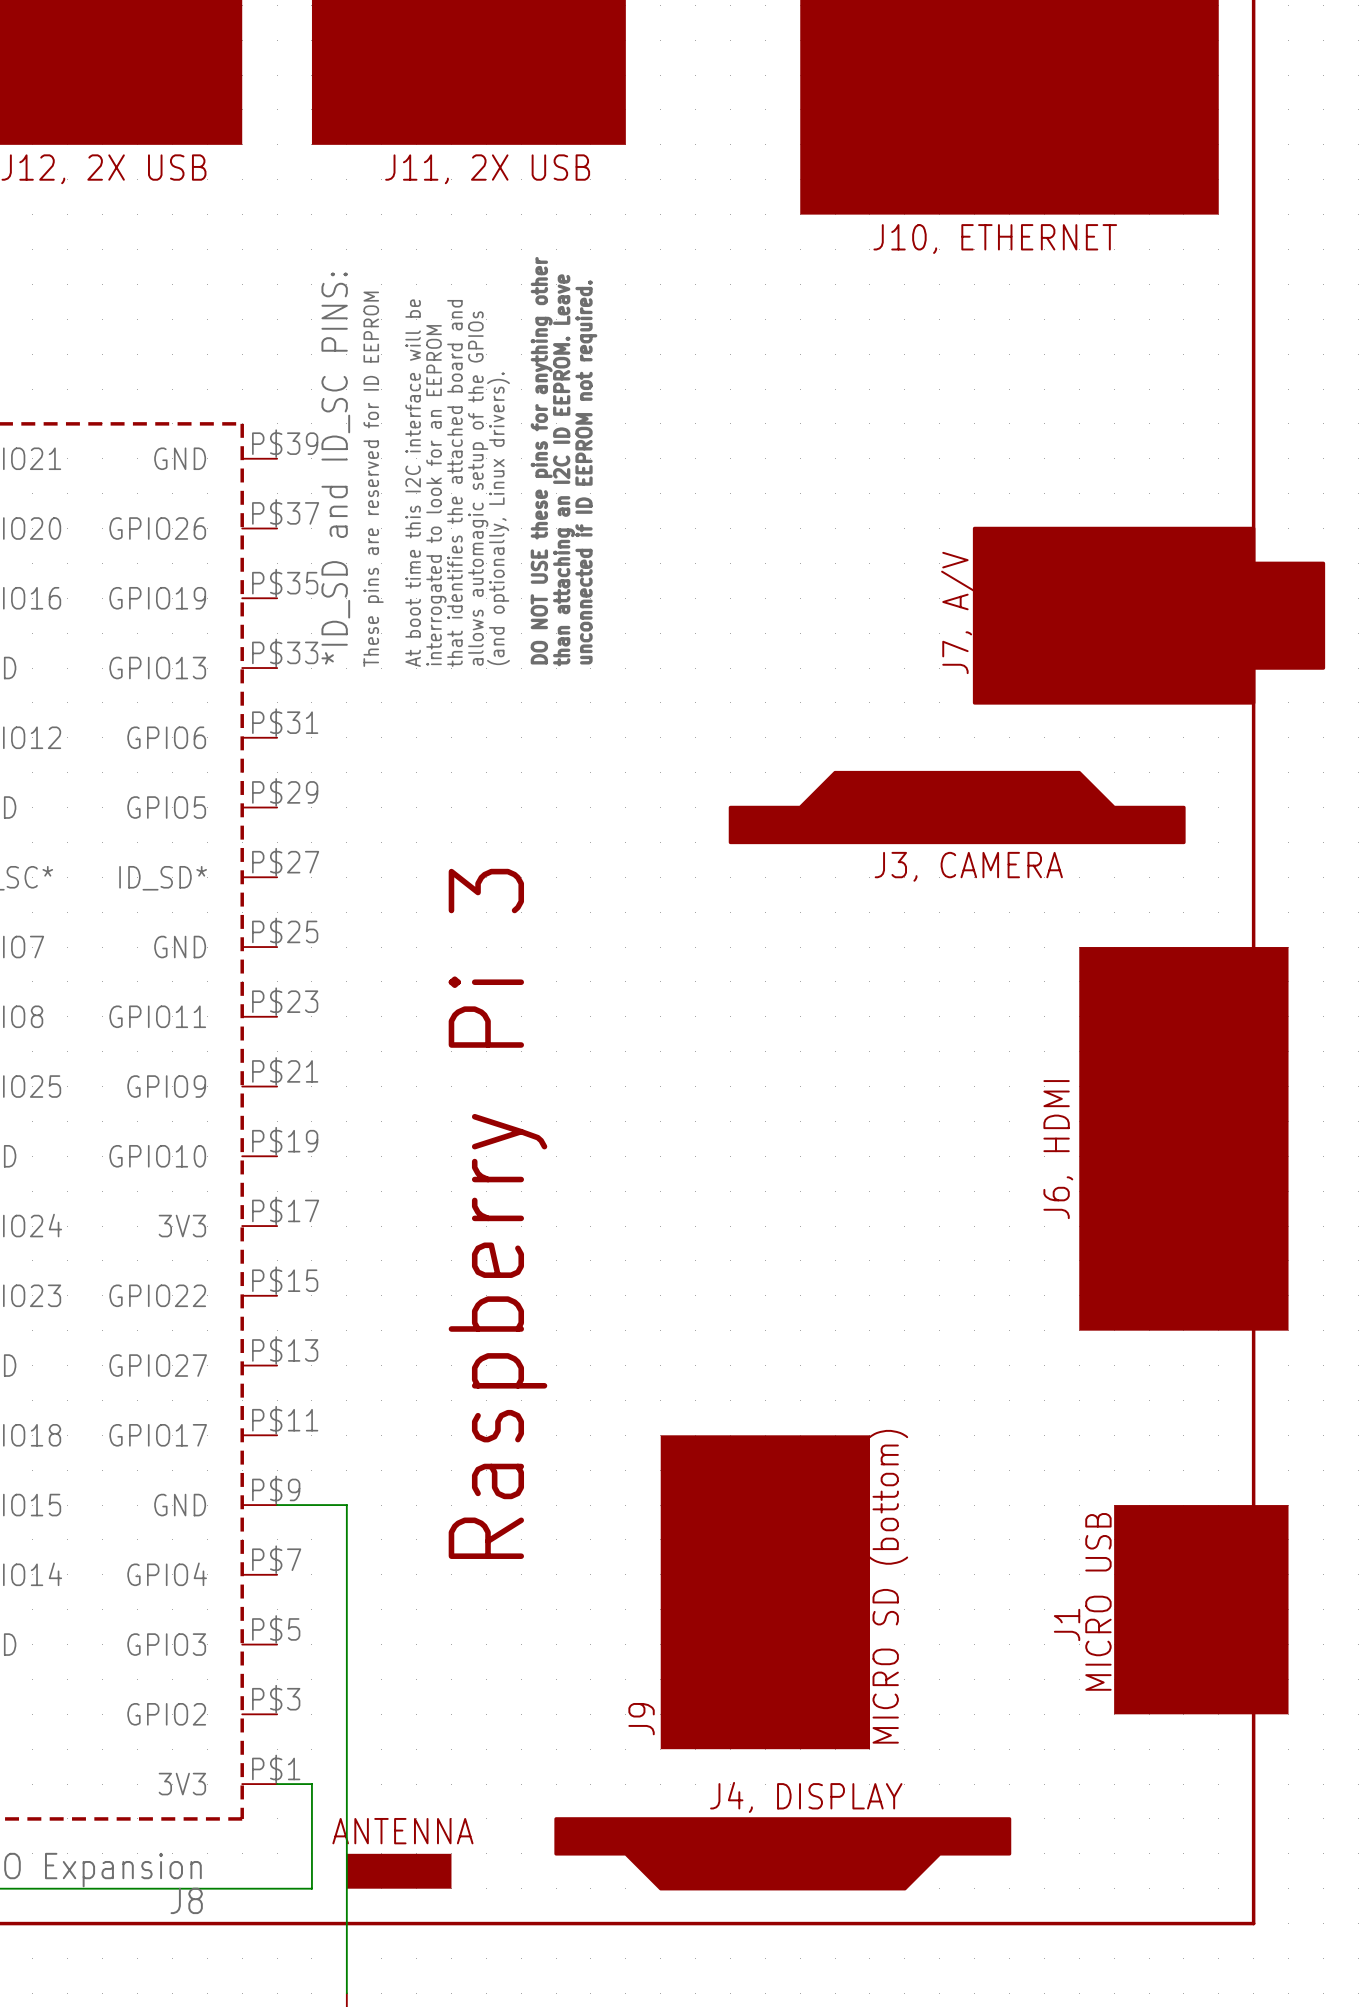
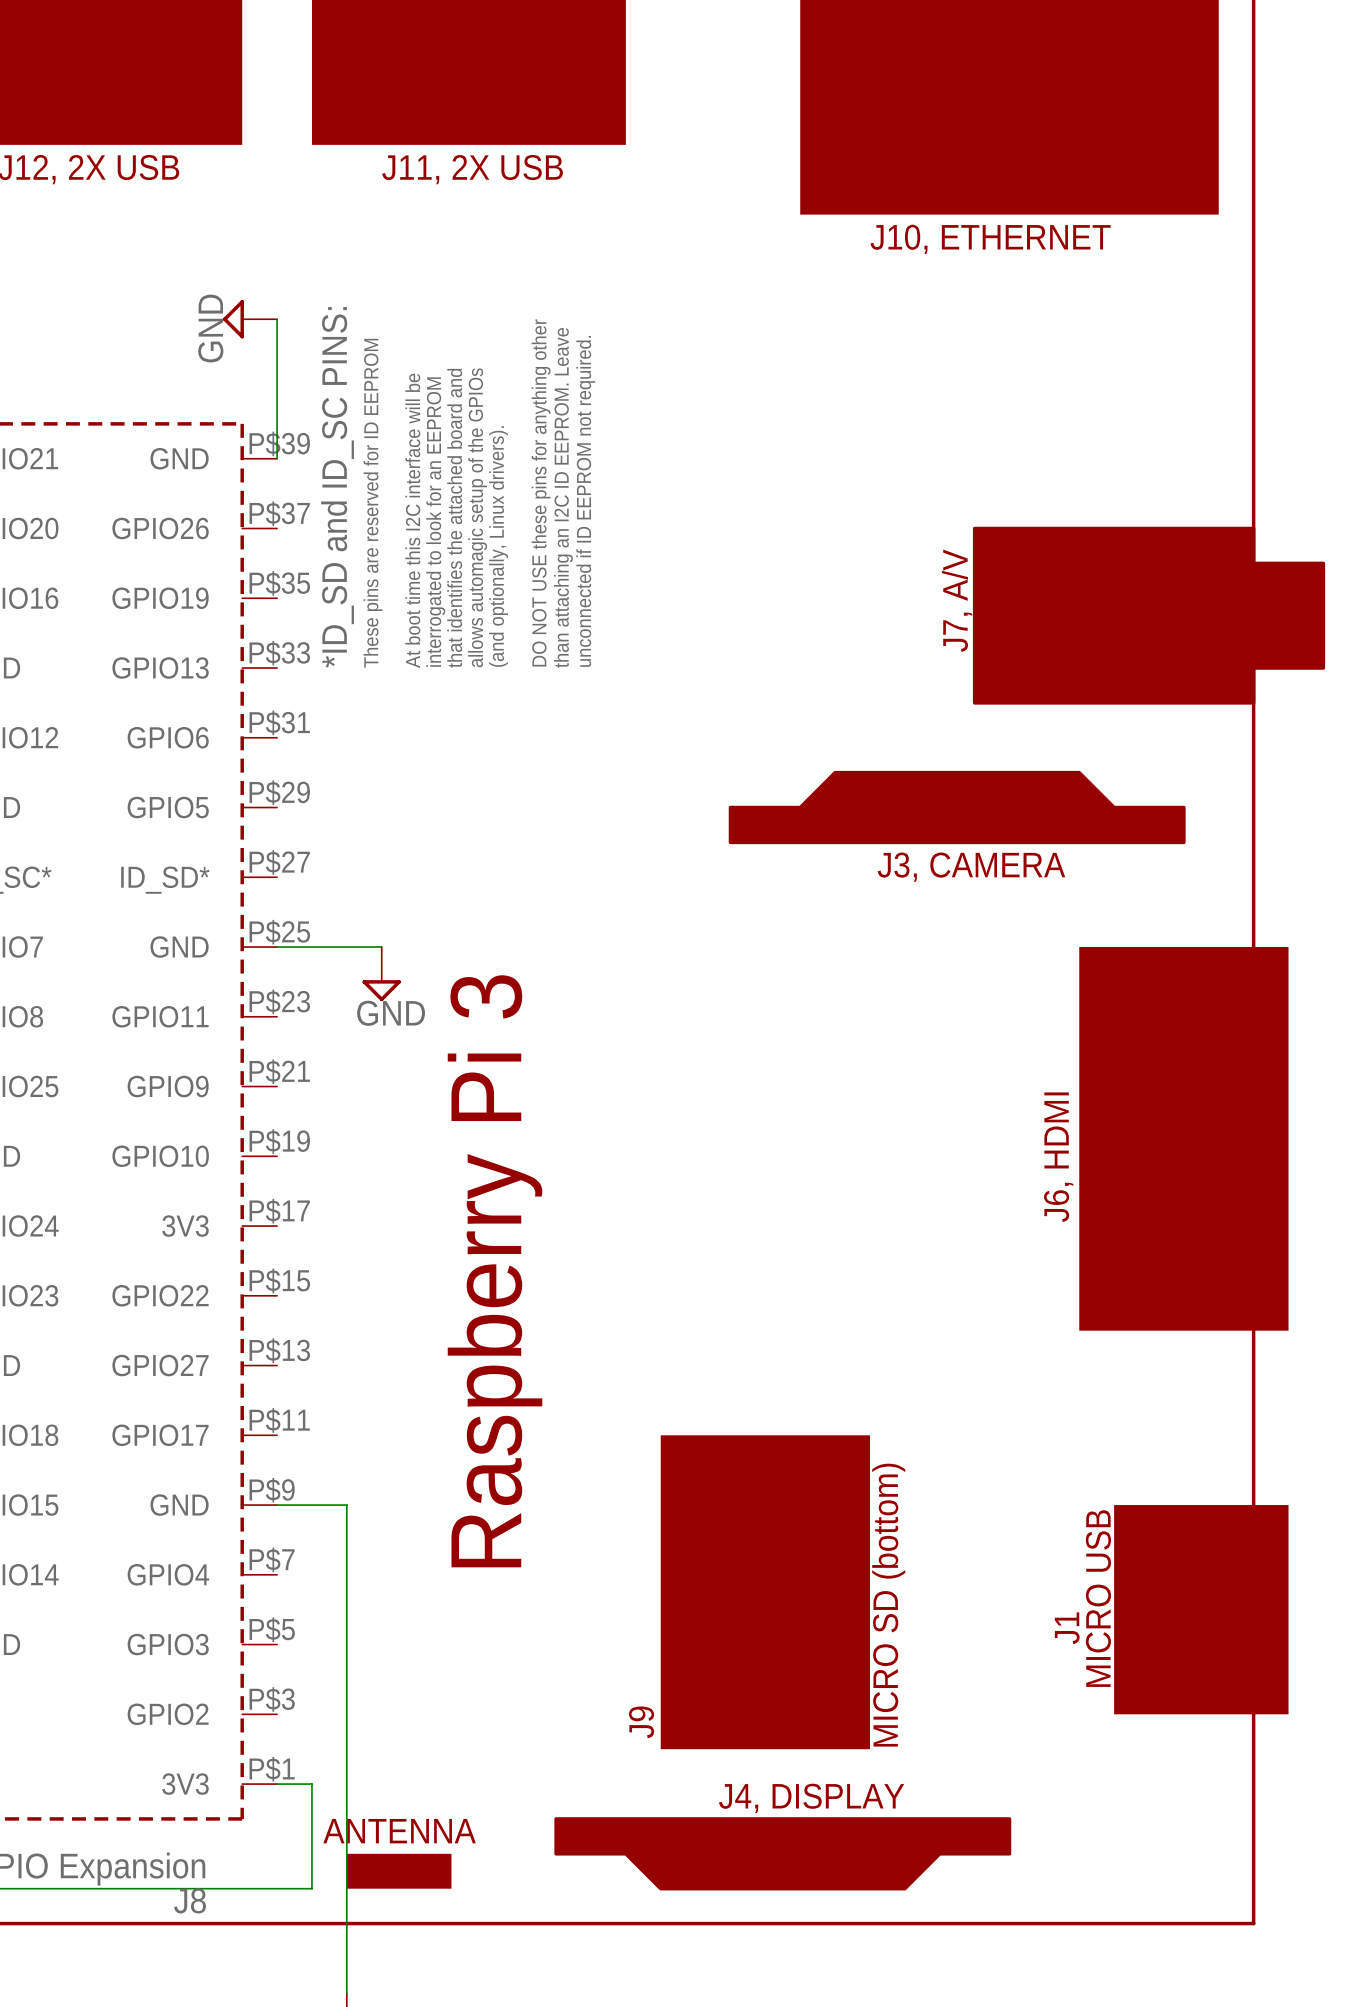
power symbol: none -> GND (250, 319)
wire: none -> (277, 319) (277, 458)
wire: none -> (277, 947) (381, 947)
power symbol: none -> GND (381, 974)

